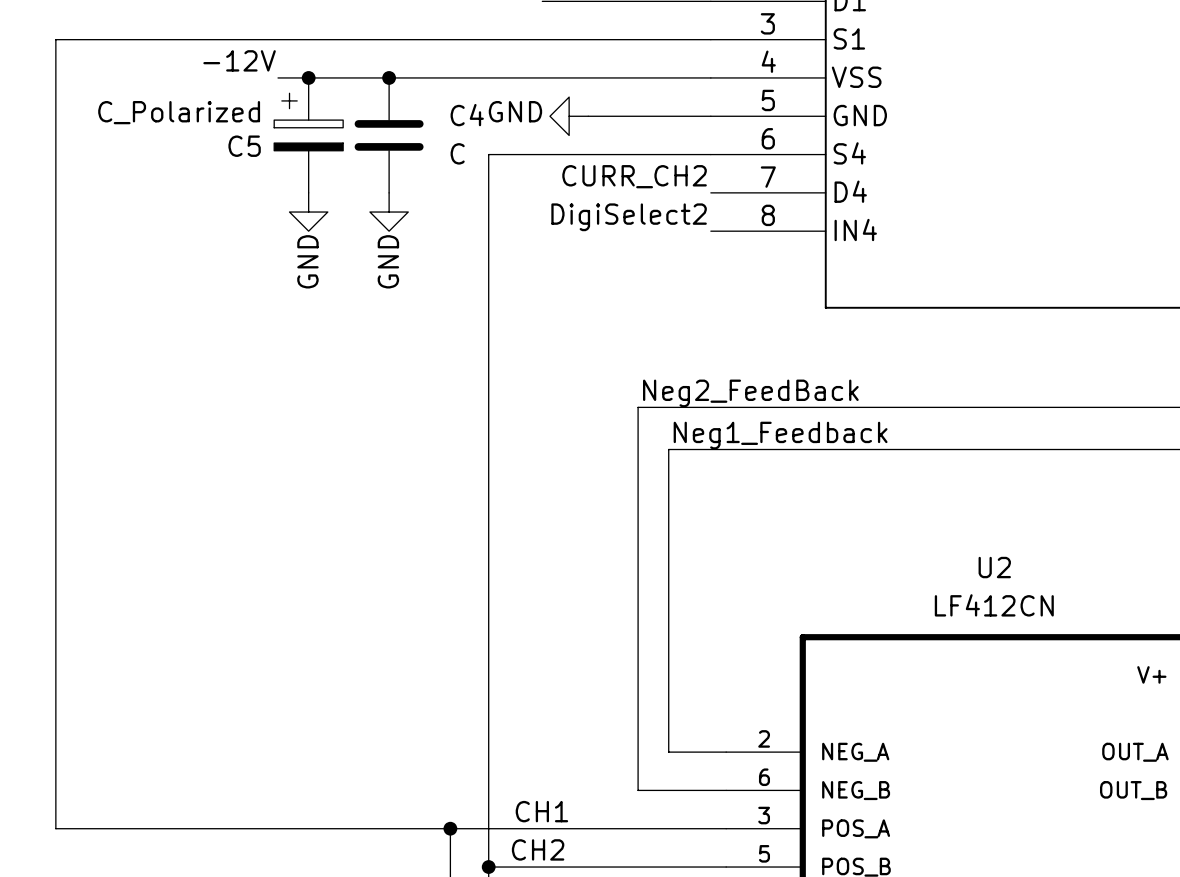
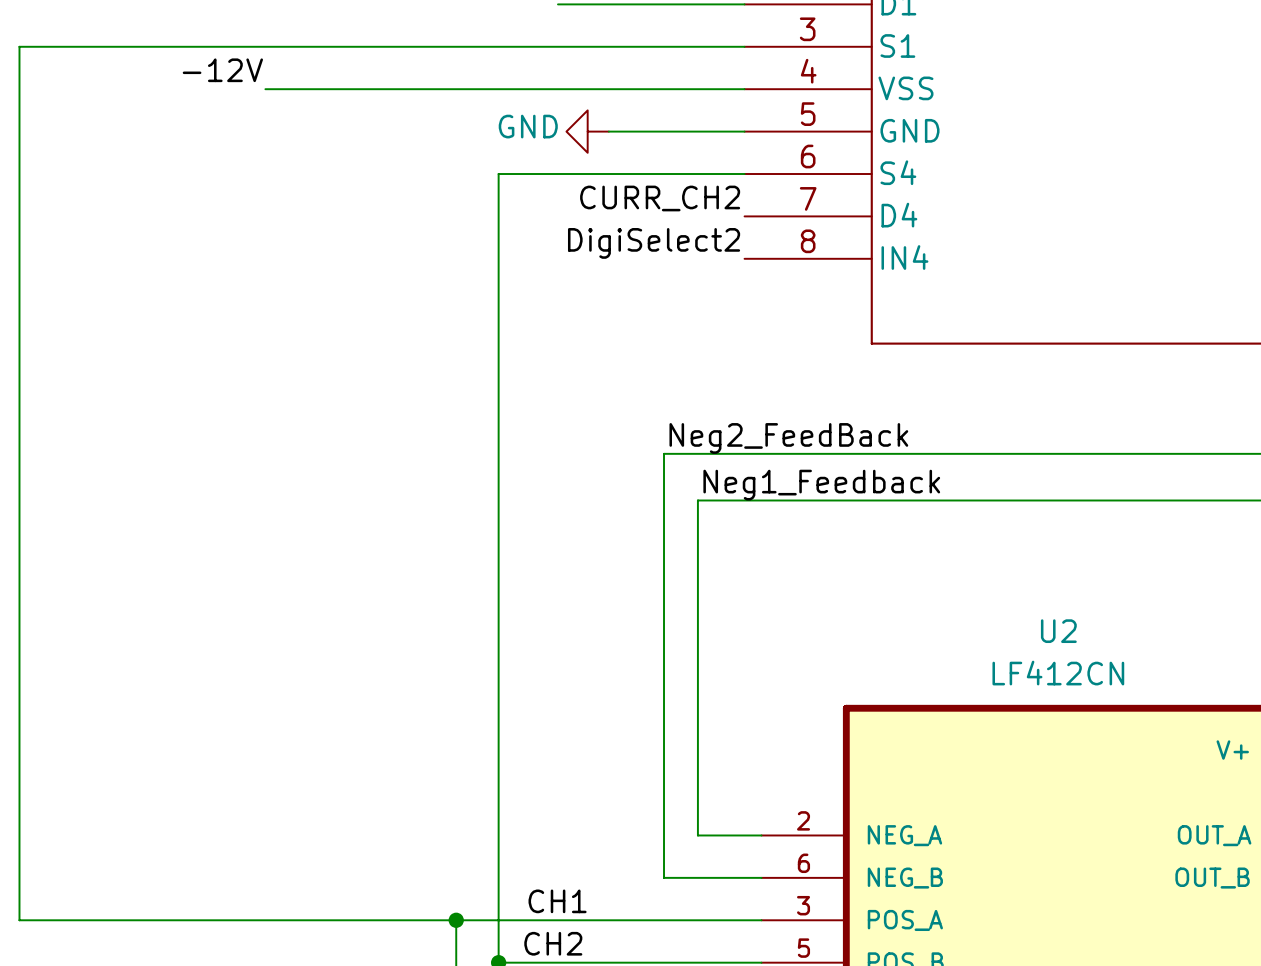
junction: (308, 77) -> none
junction: (389, 77) -> none
C5: C_Polarized (308, 135) -> none
C4: C (389, 135) -> none
power symbol: GND (308, 212) -> none
power symbol: GND (389, 212) -> none

